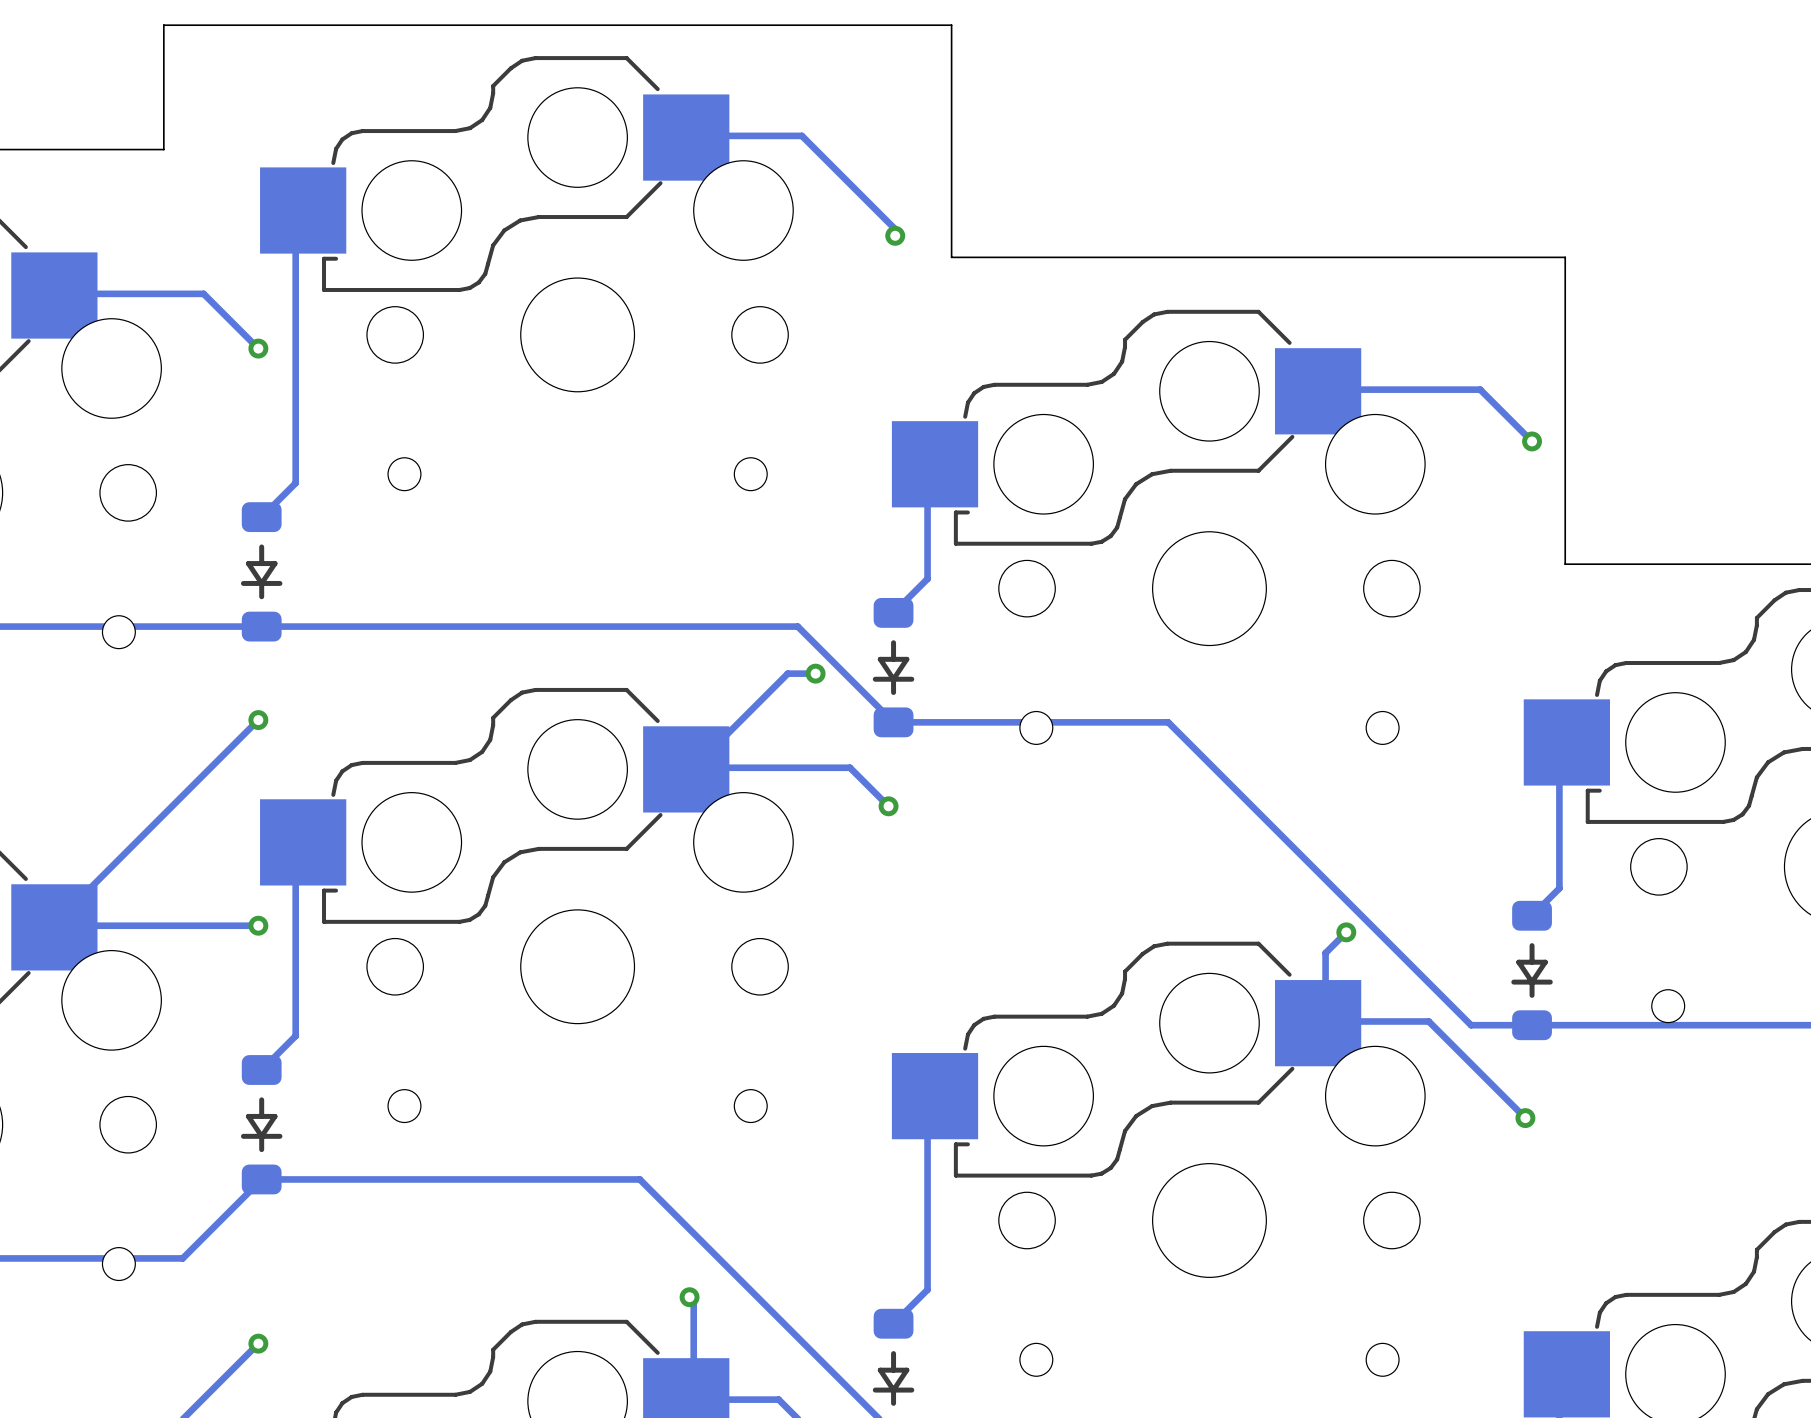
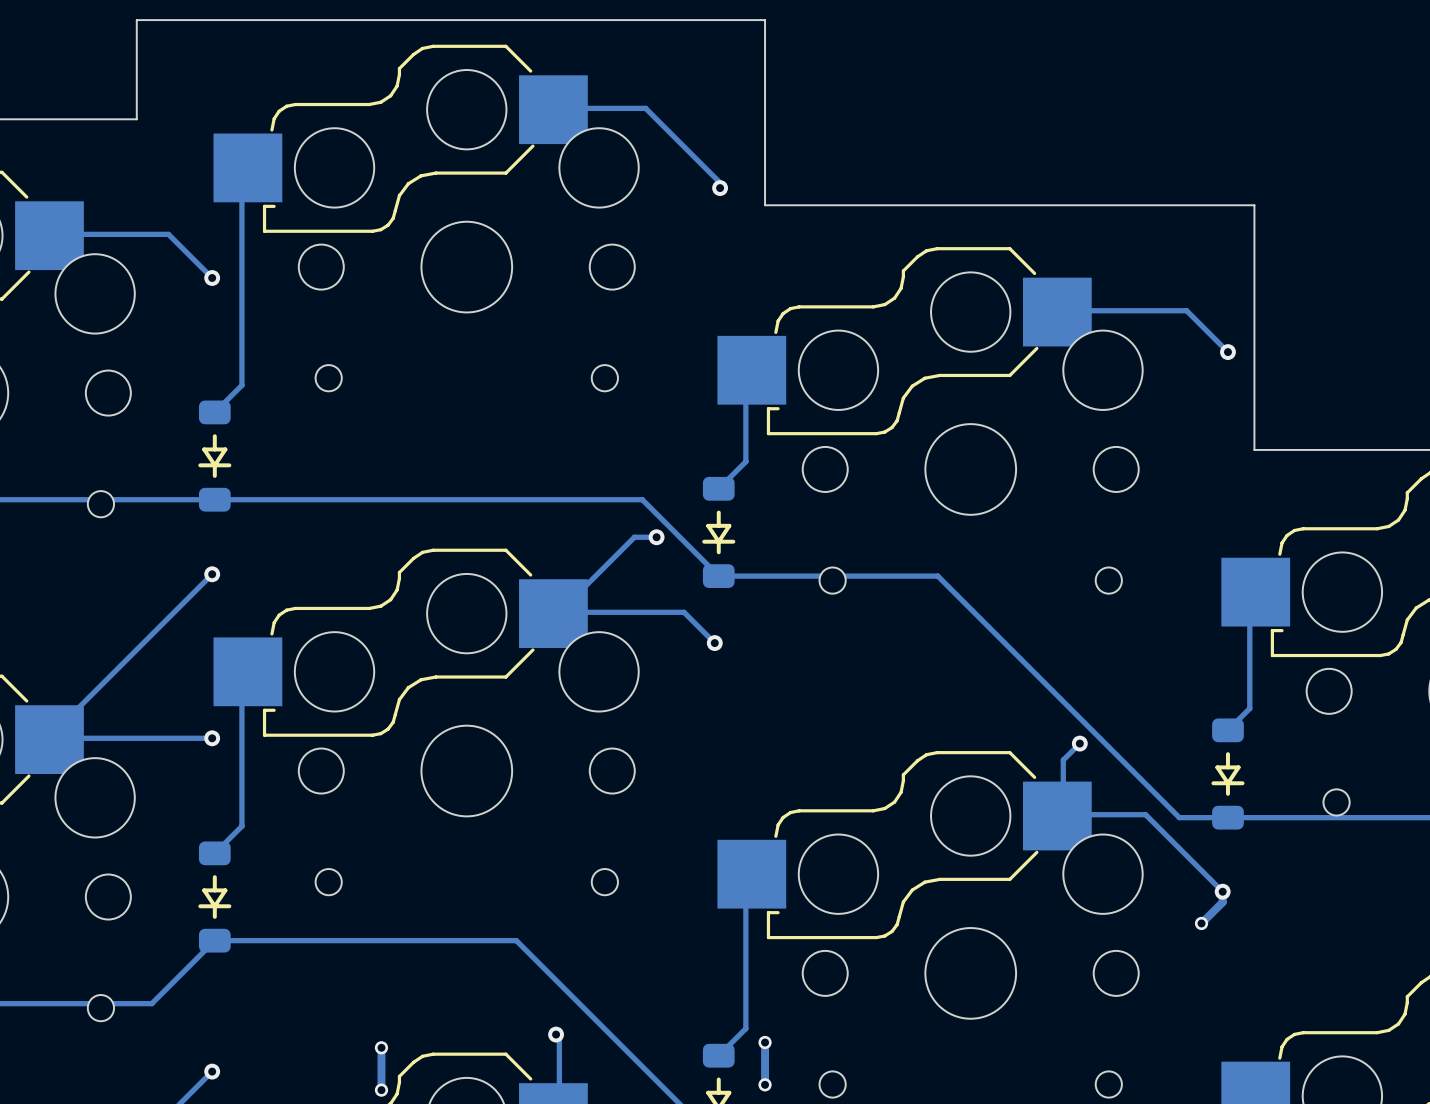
track: none -> (1222, 891) (1222, 902) (1201, 923)
via: none -> (1201, 923)
track: none -> (765, 1042) (765, 1084)
via: none -> (765, 1042)
track: none -> (381, 1047) (381, 1090)
via: none -> (381, 1047)
via: none -> (765, 1084)
via: none -> (381, 1090)

